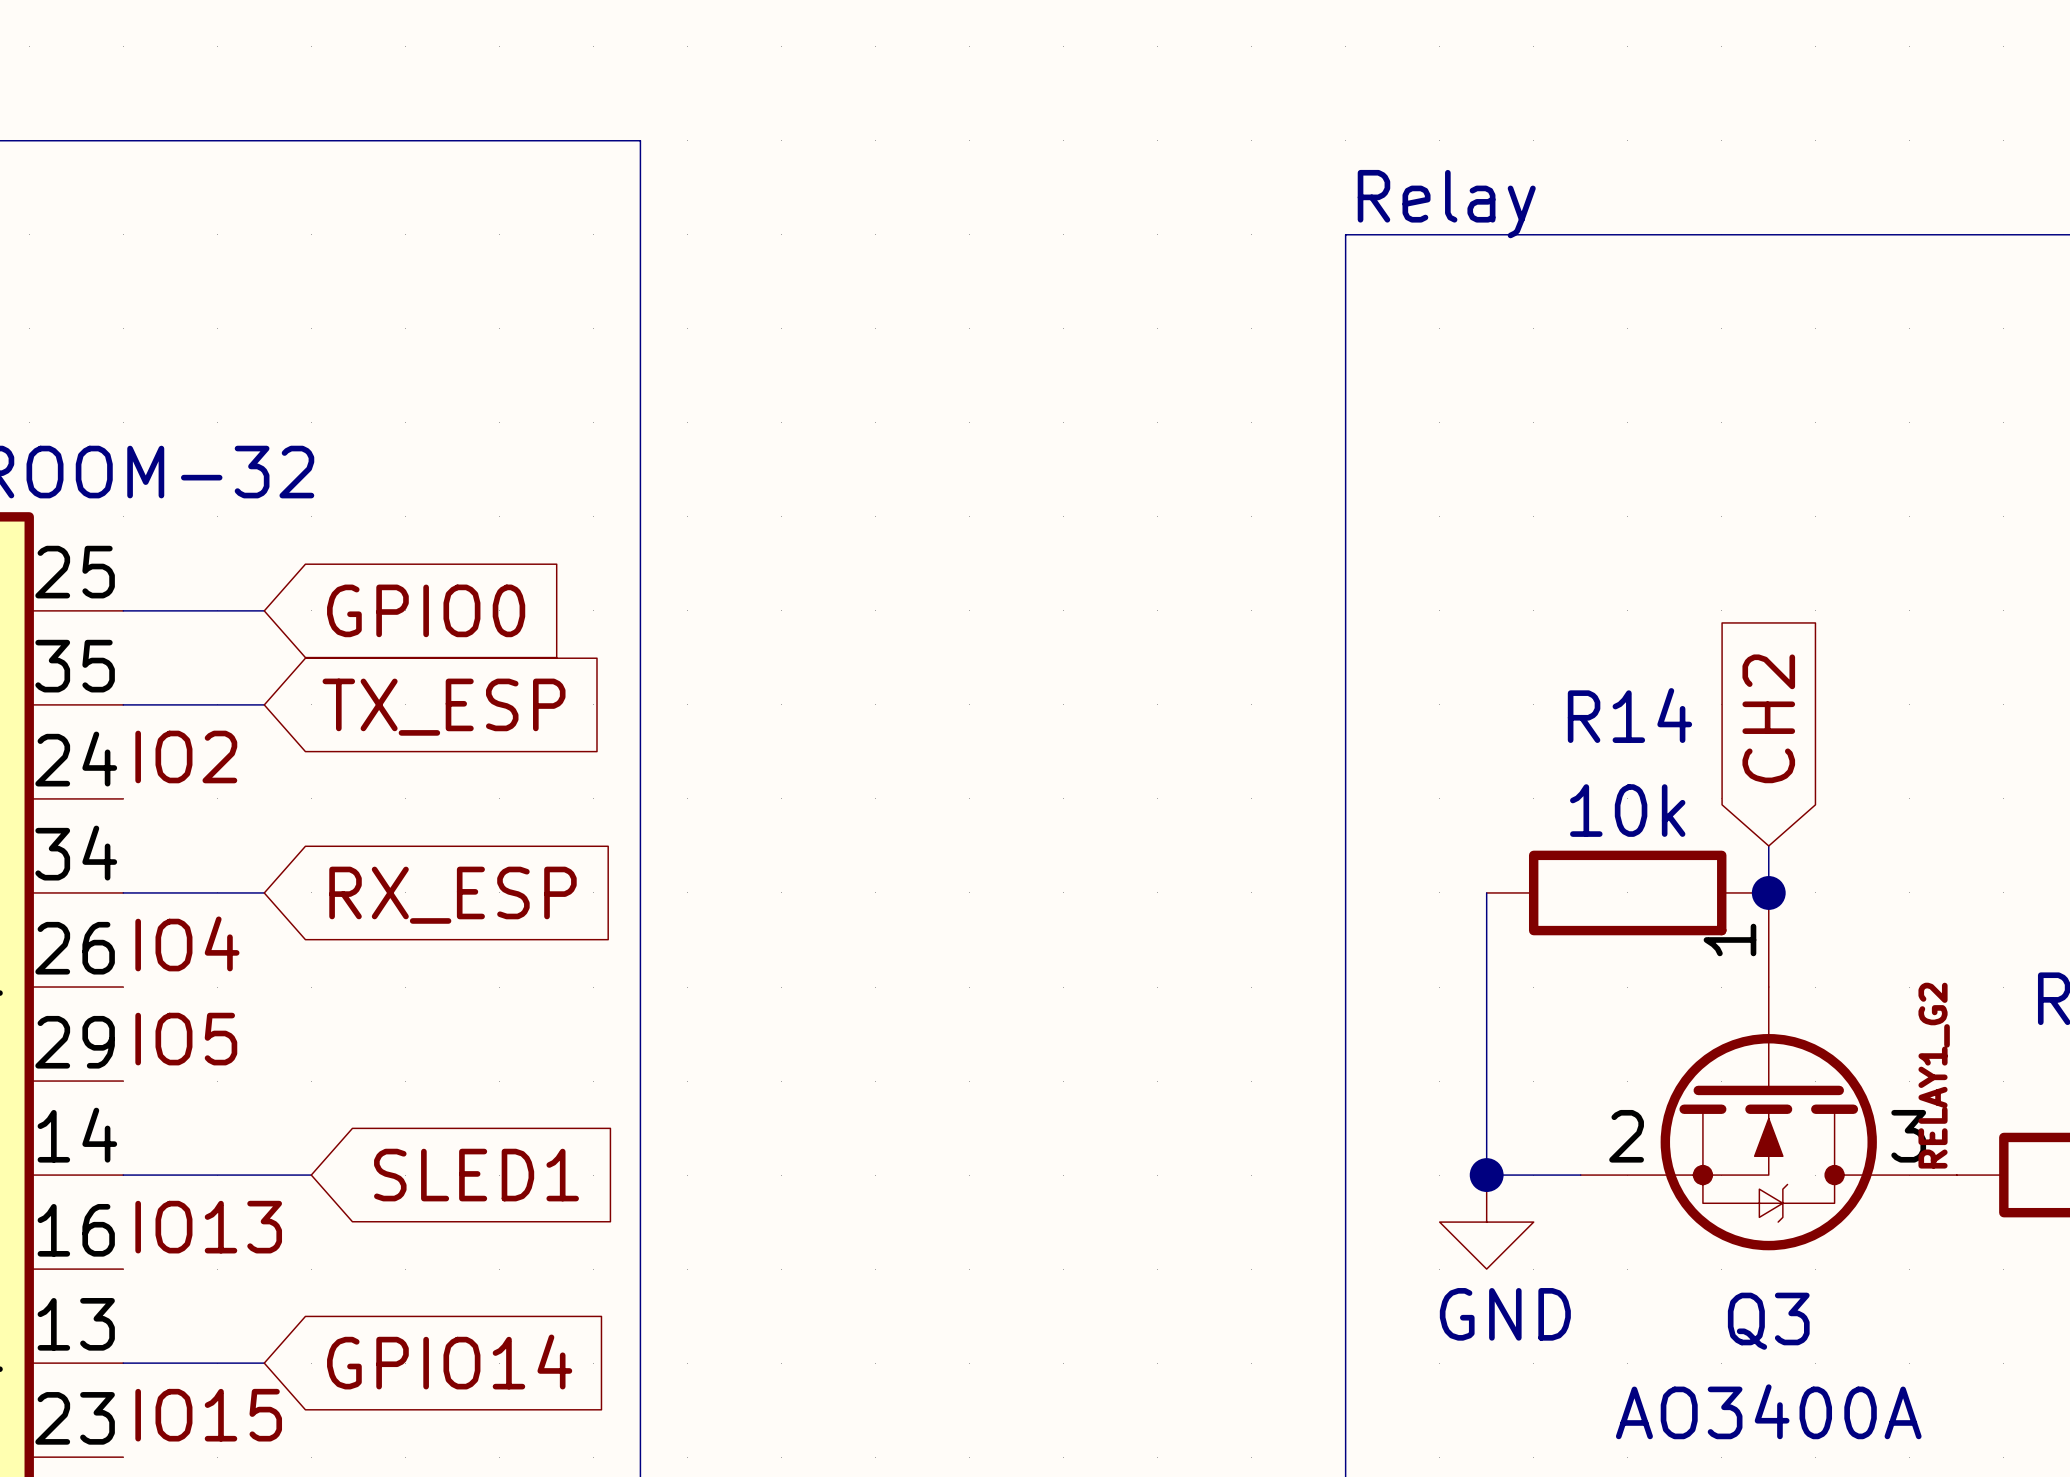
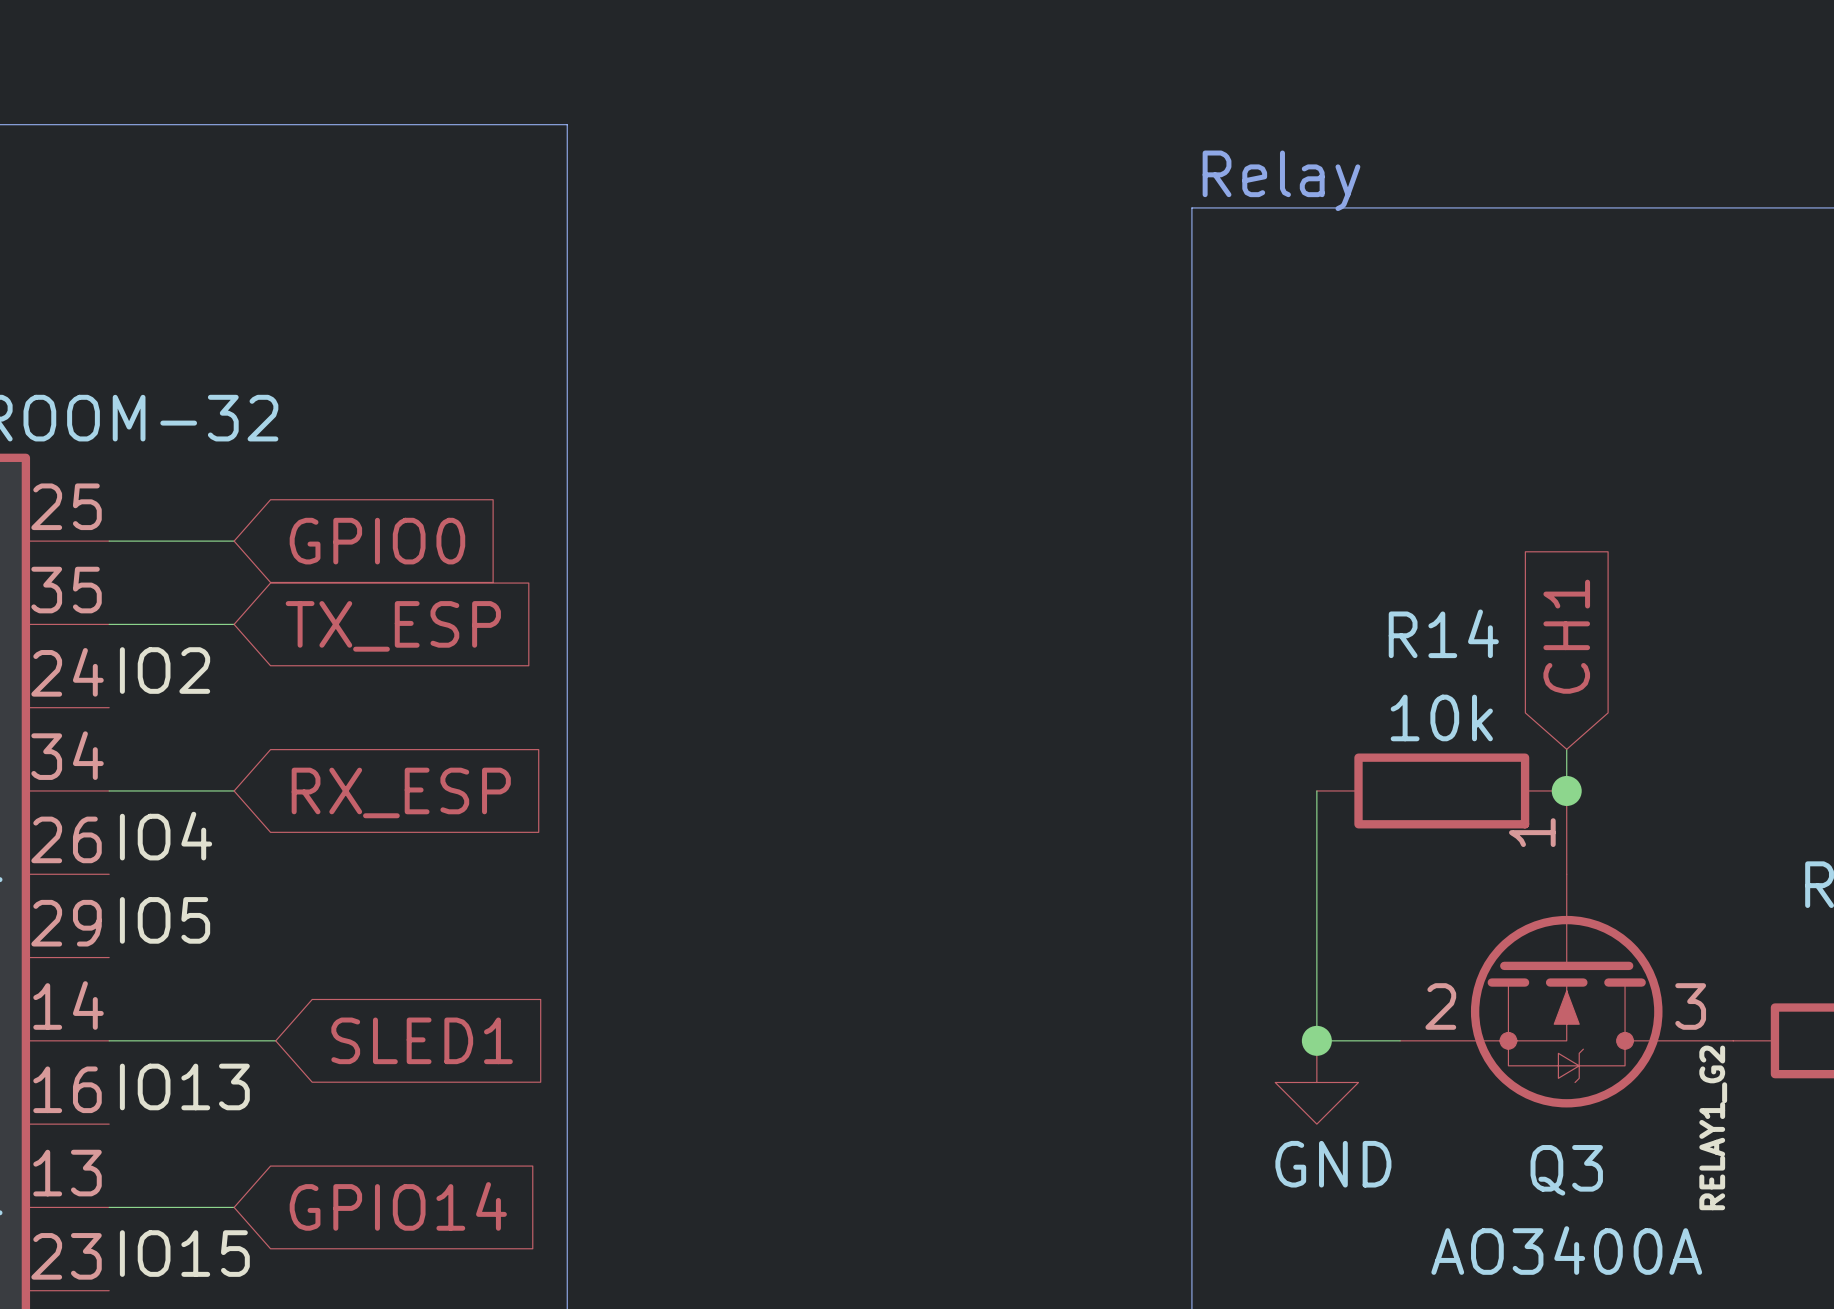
global label: CH2 (1768, 718) -> CH1 (1566, 636)
label position: RELAY1_G2 (1934, 1075) -> RELAY1_G2 (1713, 1127)

